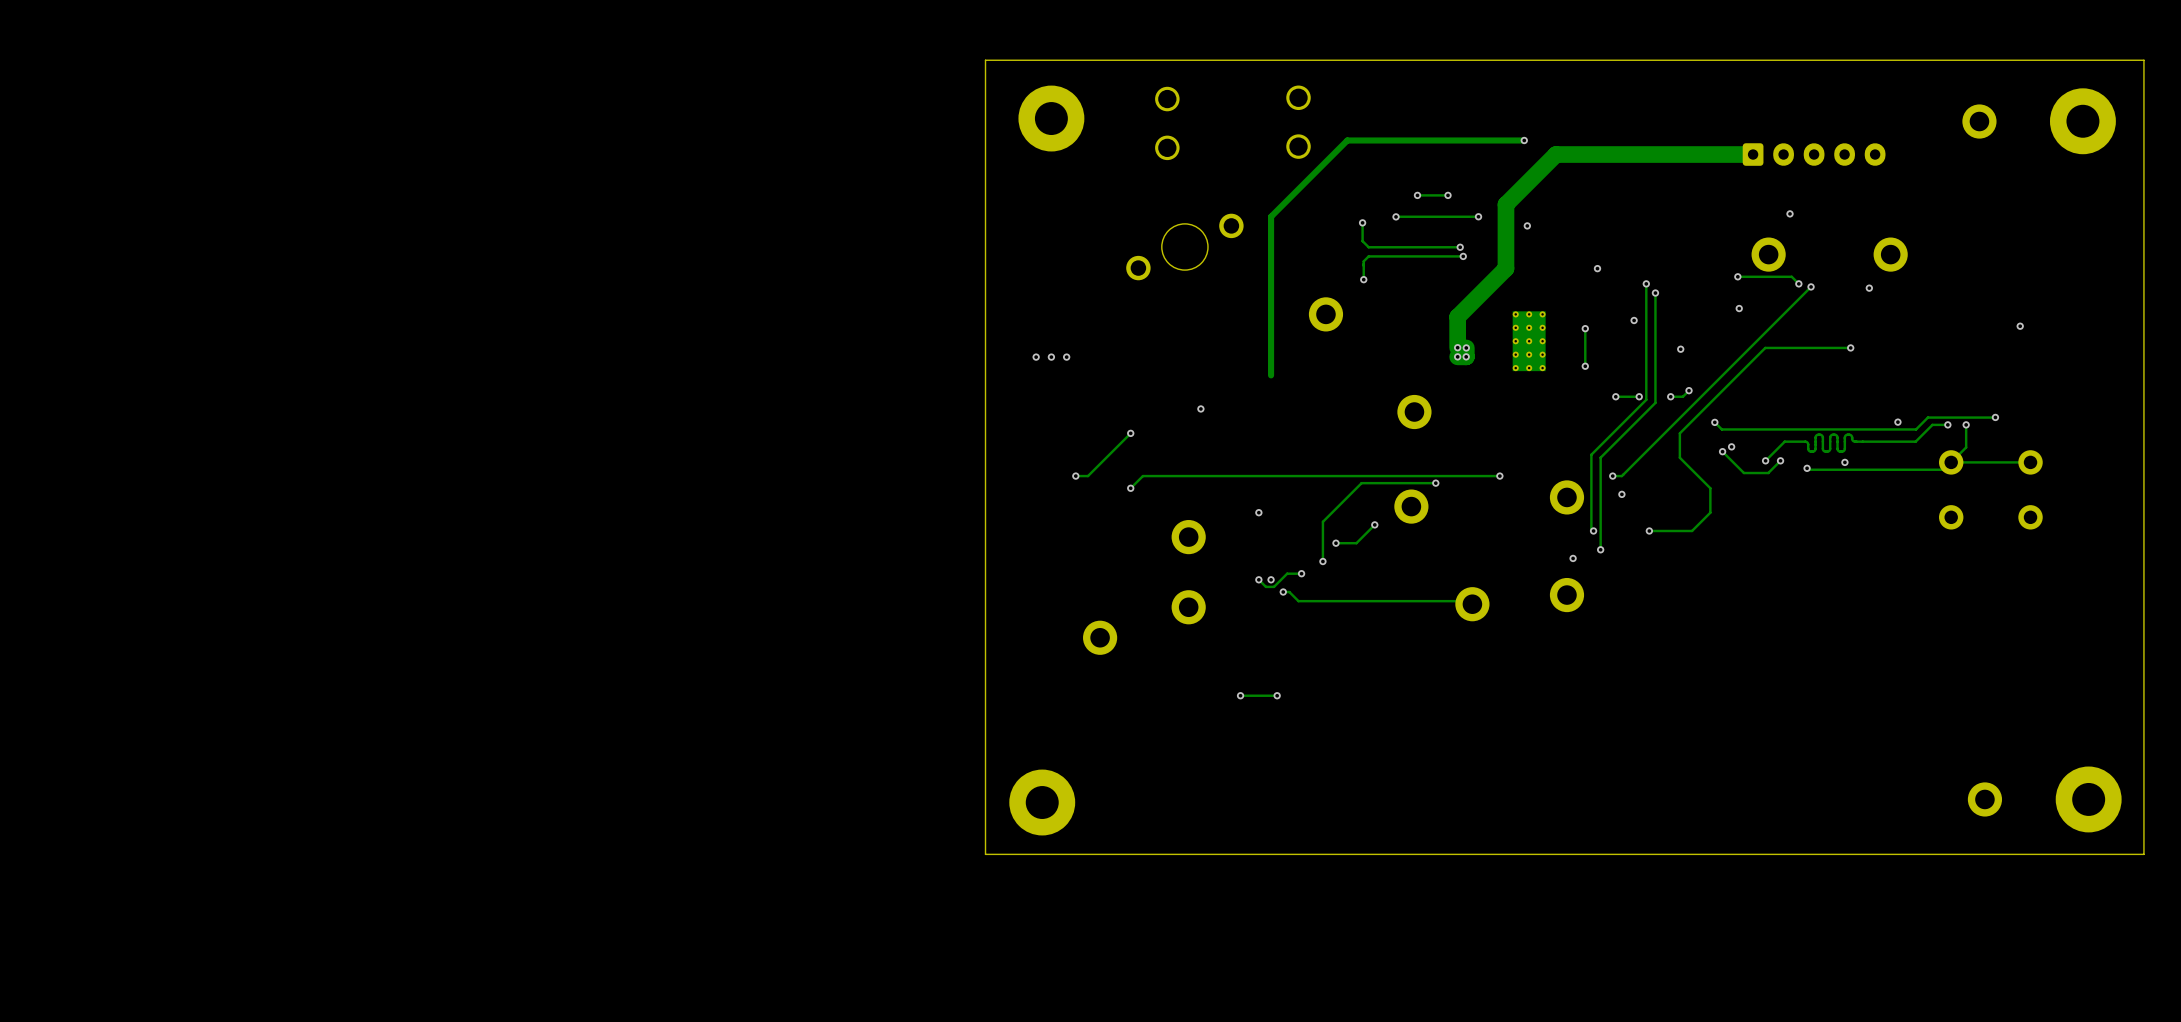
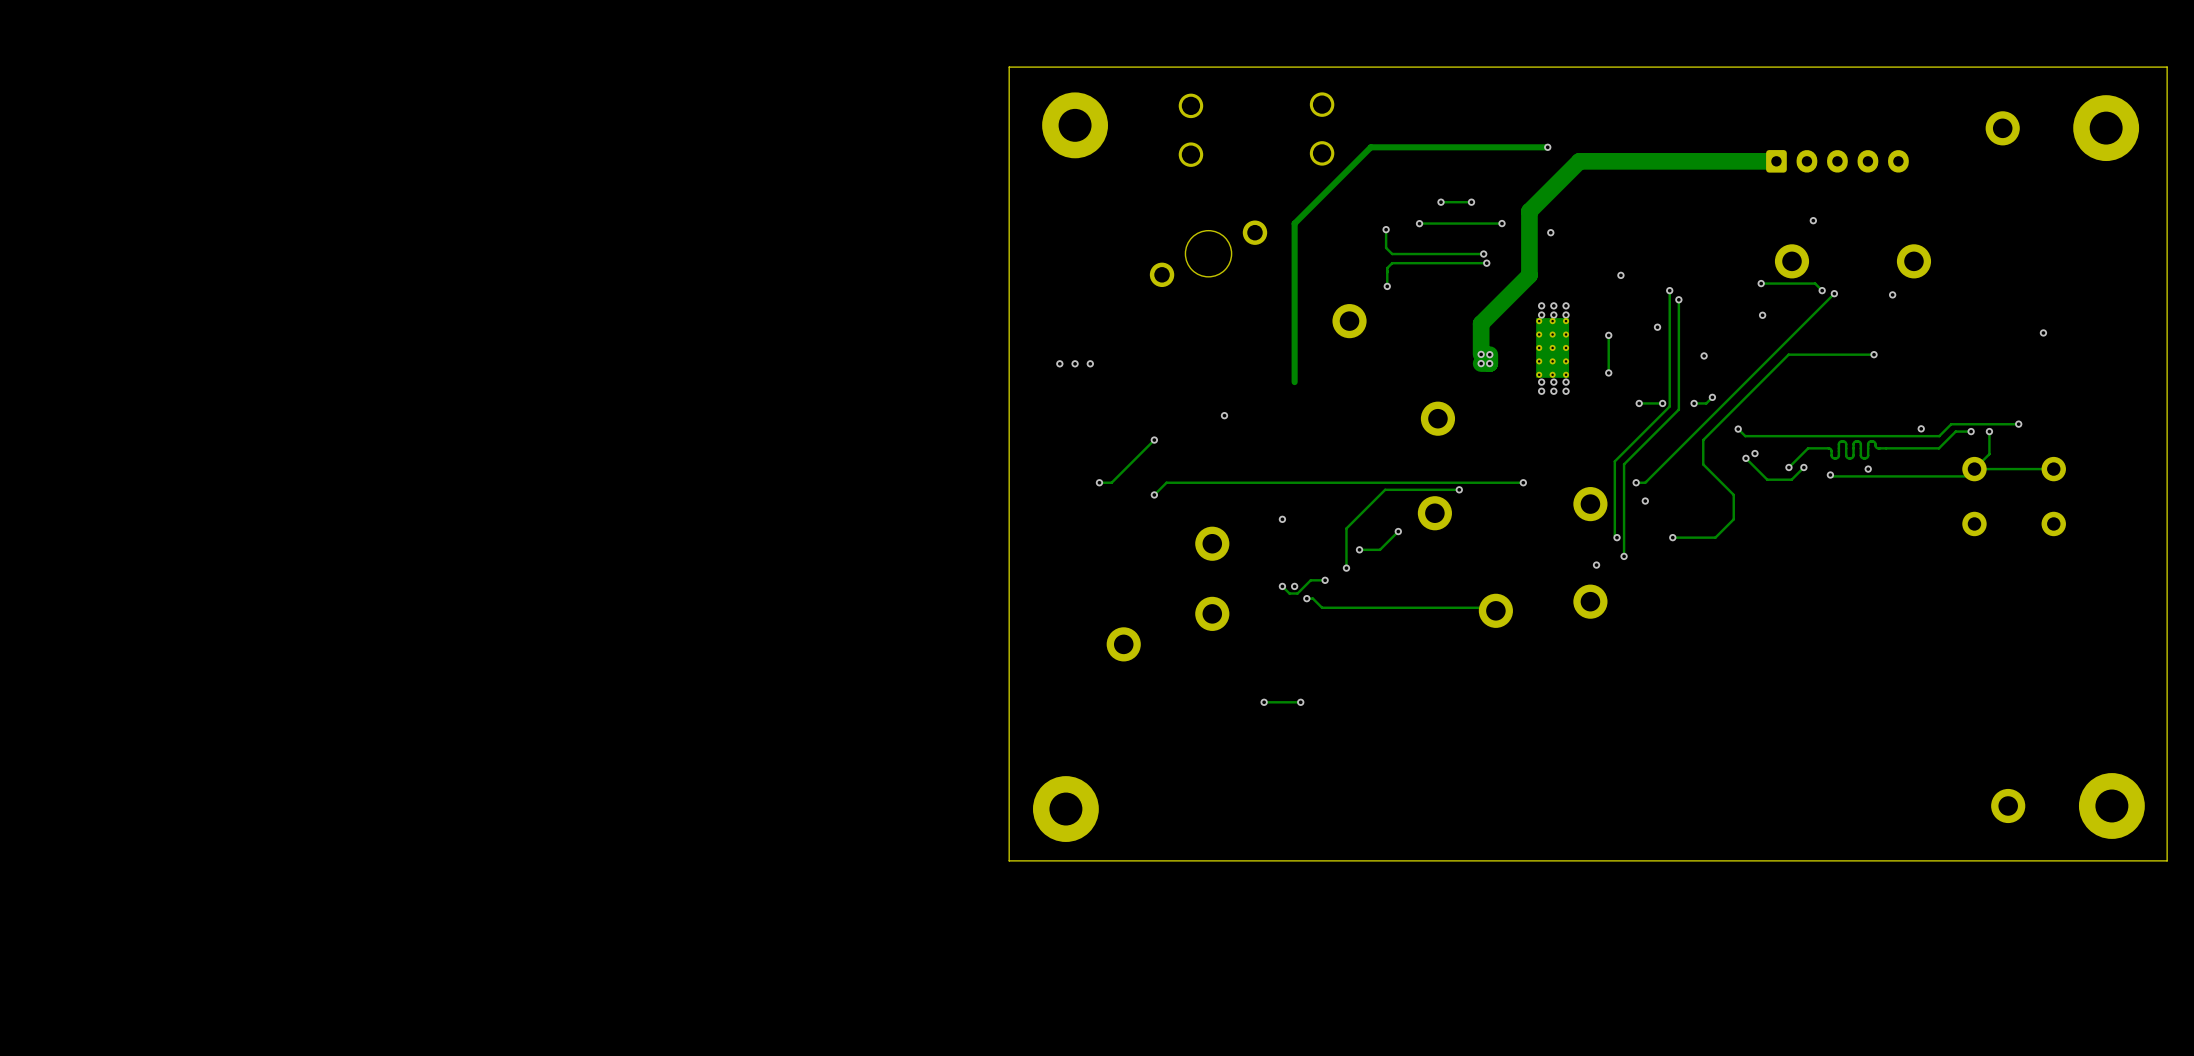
via: none -> (1541, 305)
via: none -> (1553, 305)
via: none -> (1566, 305)
via: none -> (1541, 315)
via: none -> (1553, 315)
via: none -> (1566, 315)
via: none -> (1541, 382)
via: none -> (1553, 382)
via: none -> (1566, 382)
via: none -> (1541, 391)
via: none -> (1553, 391)
via: none -> (1566, 391)

